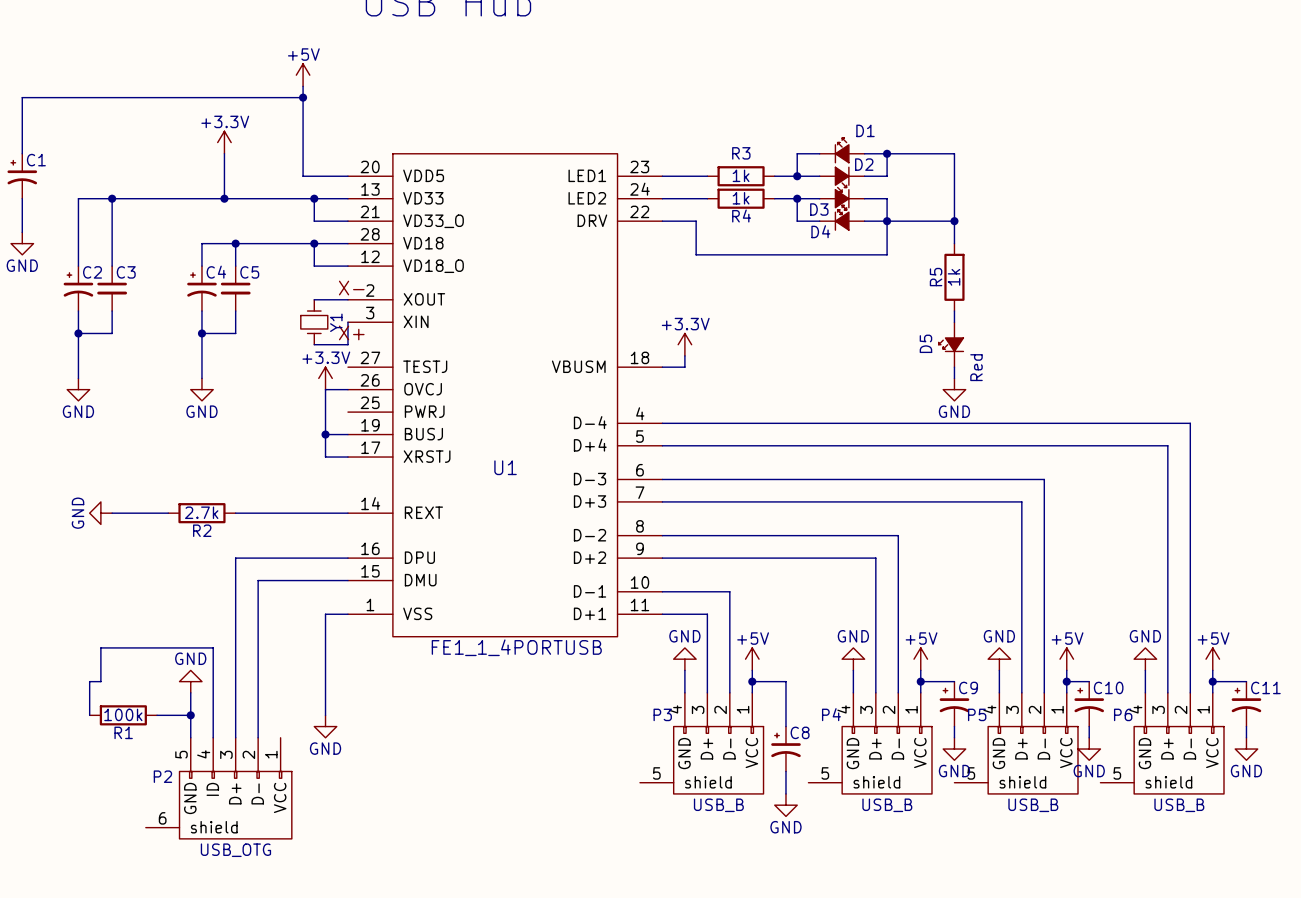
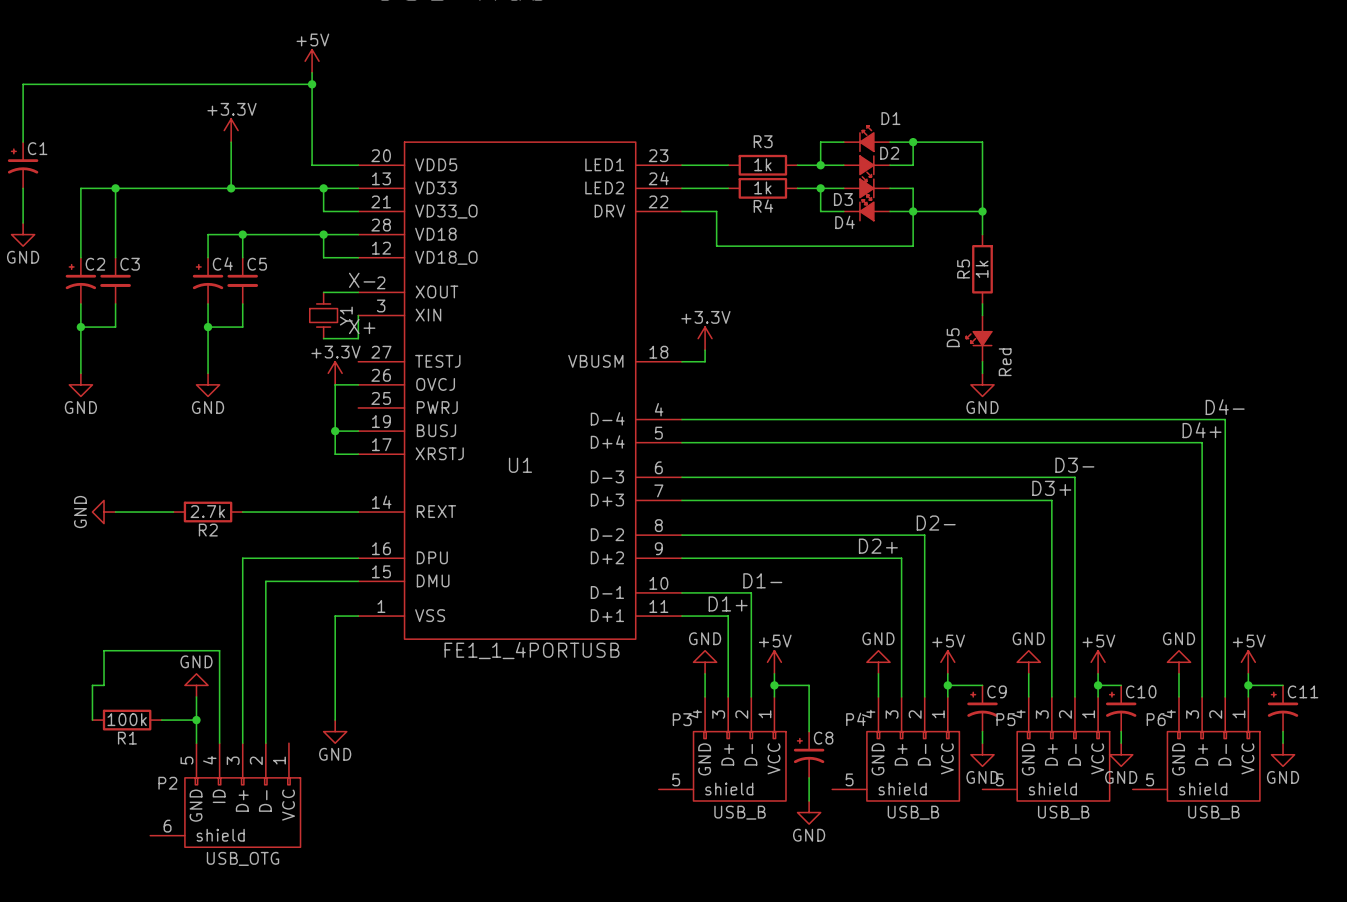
label: none -> D4- (1225, 407)
label: none -> D4+ (1202, 430)
label: none -> D3- (1074, 465)
label: none -> D3+ (1051, 488)
label: none -> D2- (936, 523)
label: none -> D2+ (878, 546)
label: none -> D1- (762, 580)
label: none -> D1+ (728, 603)

